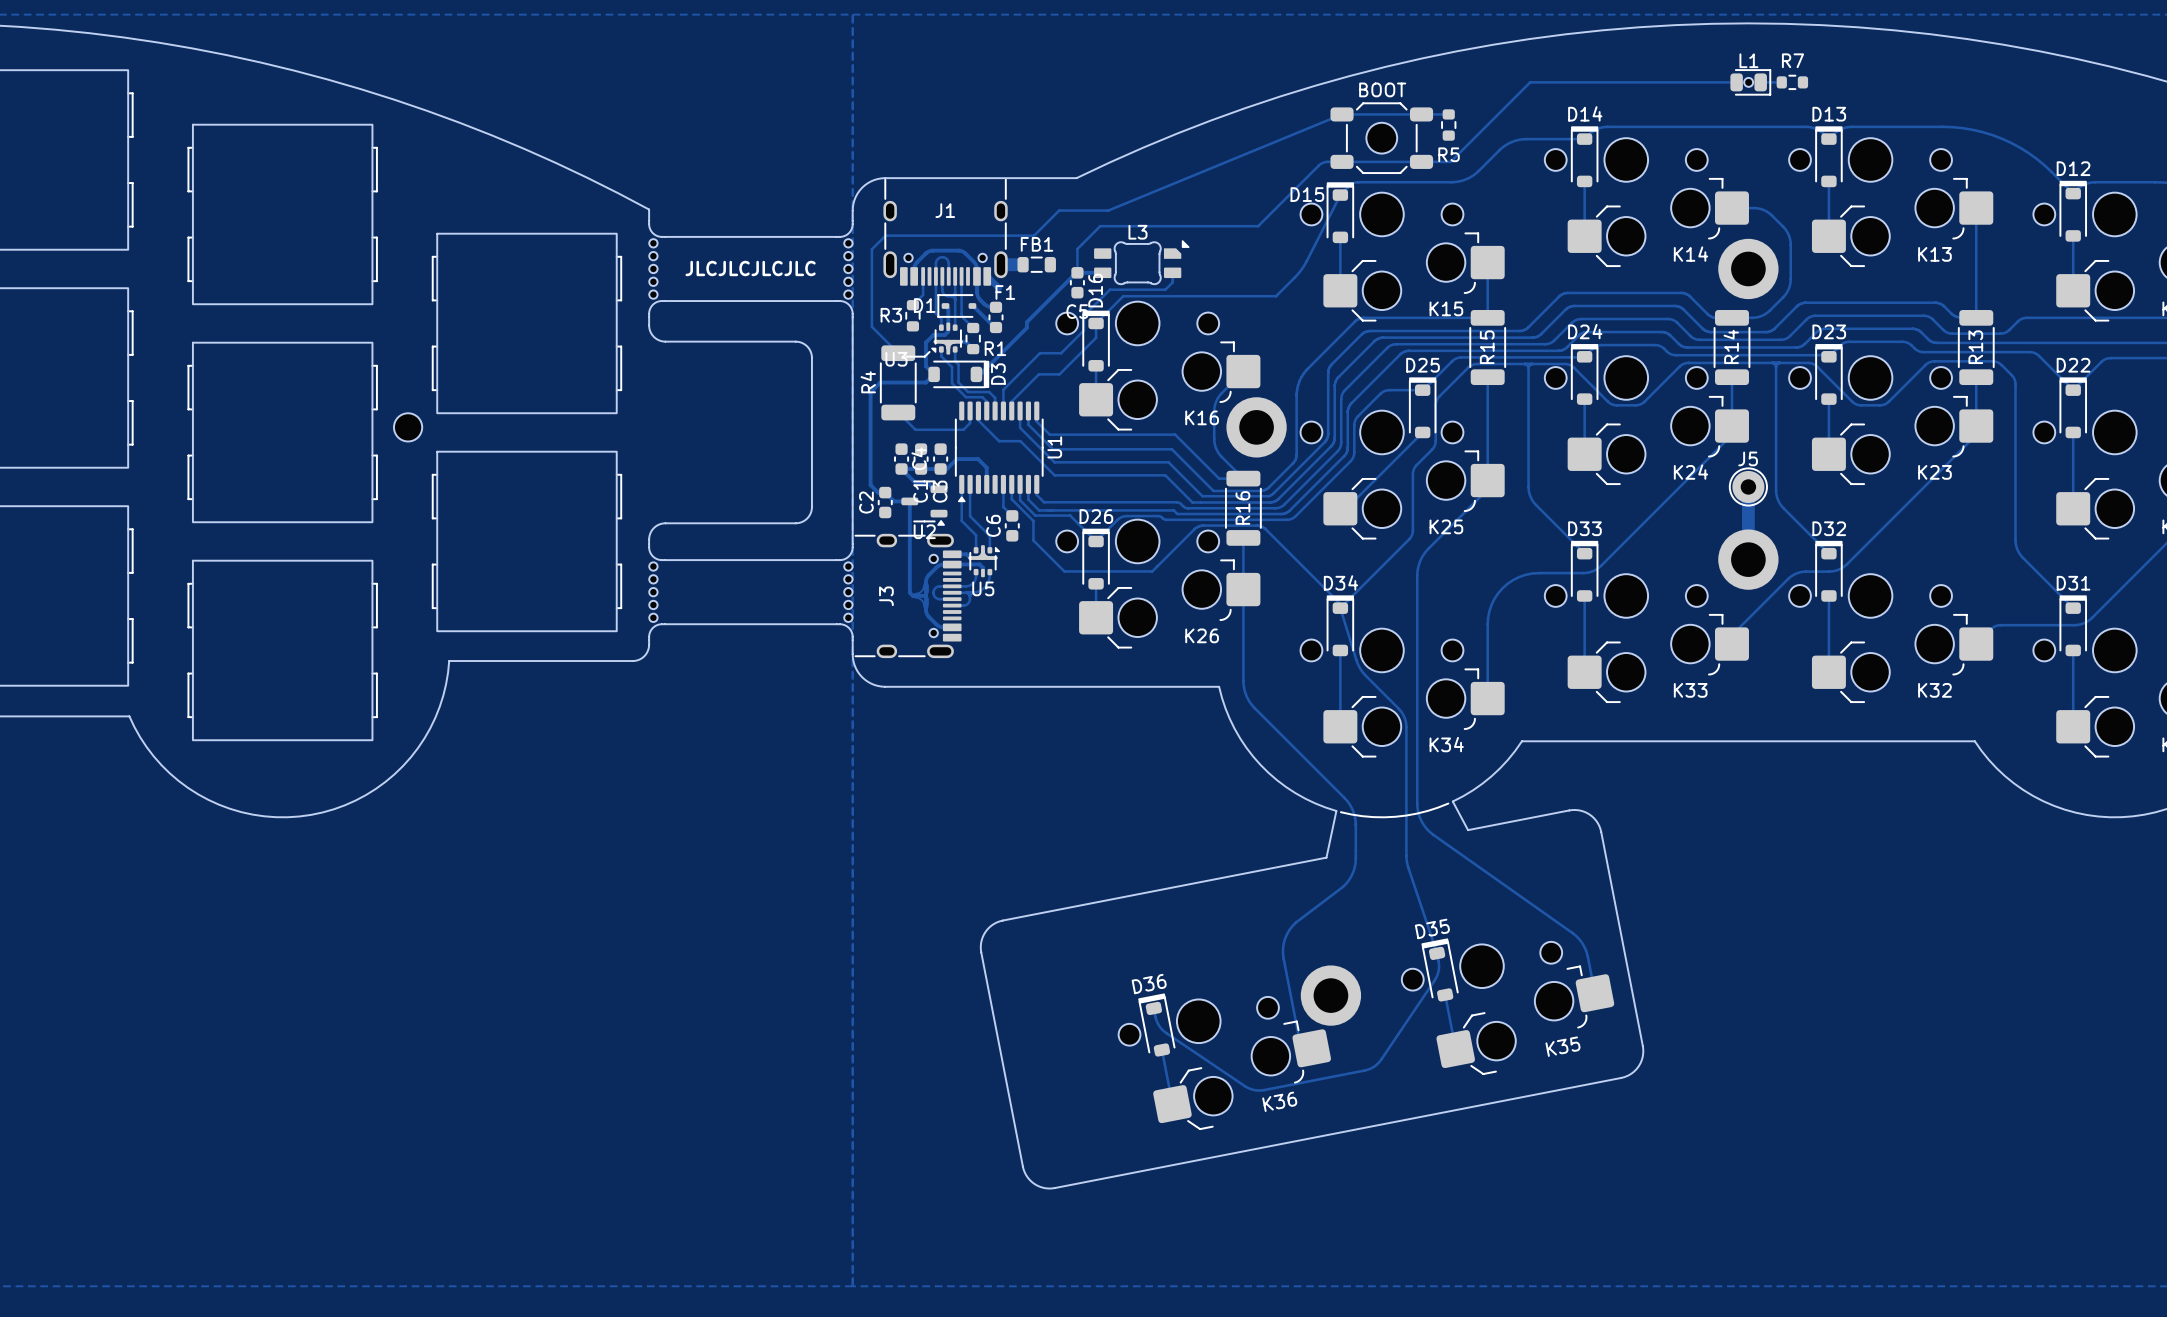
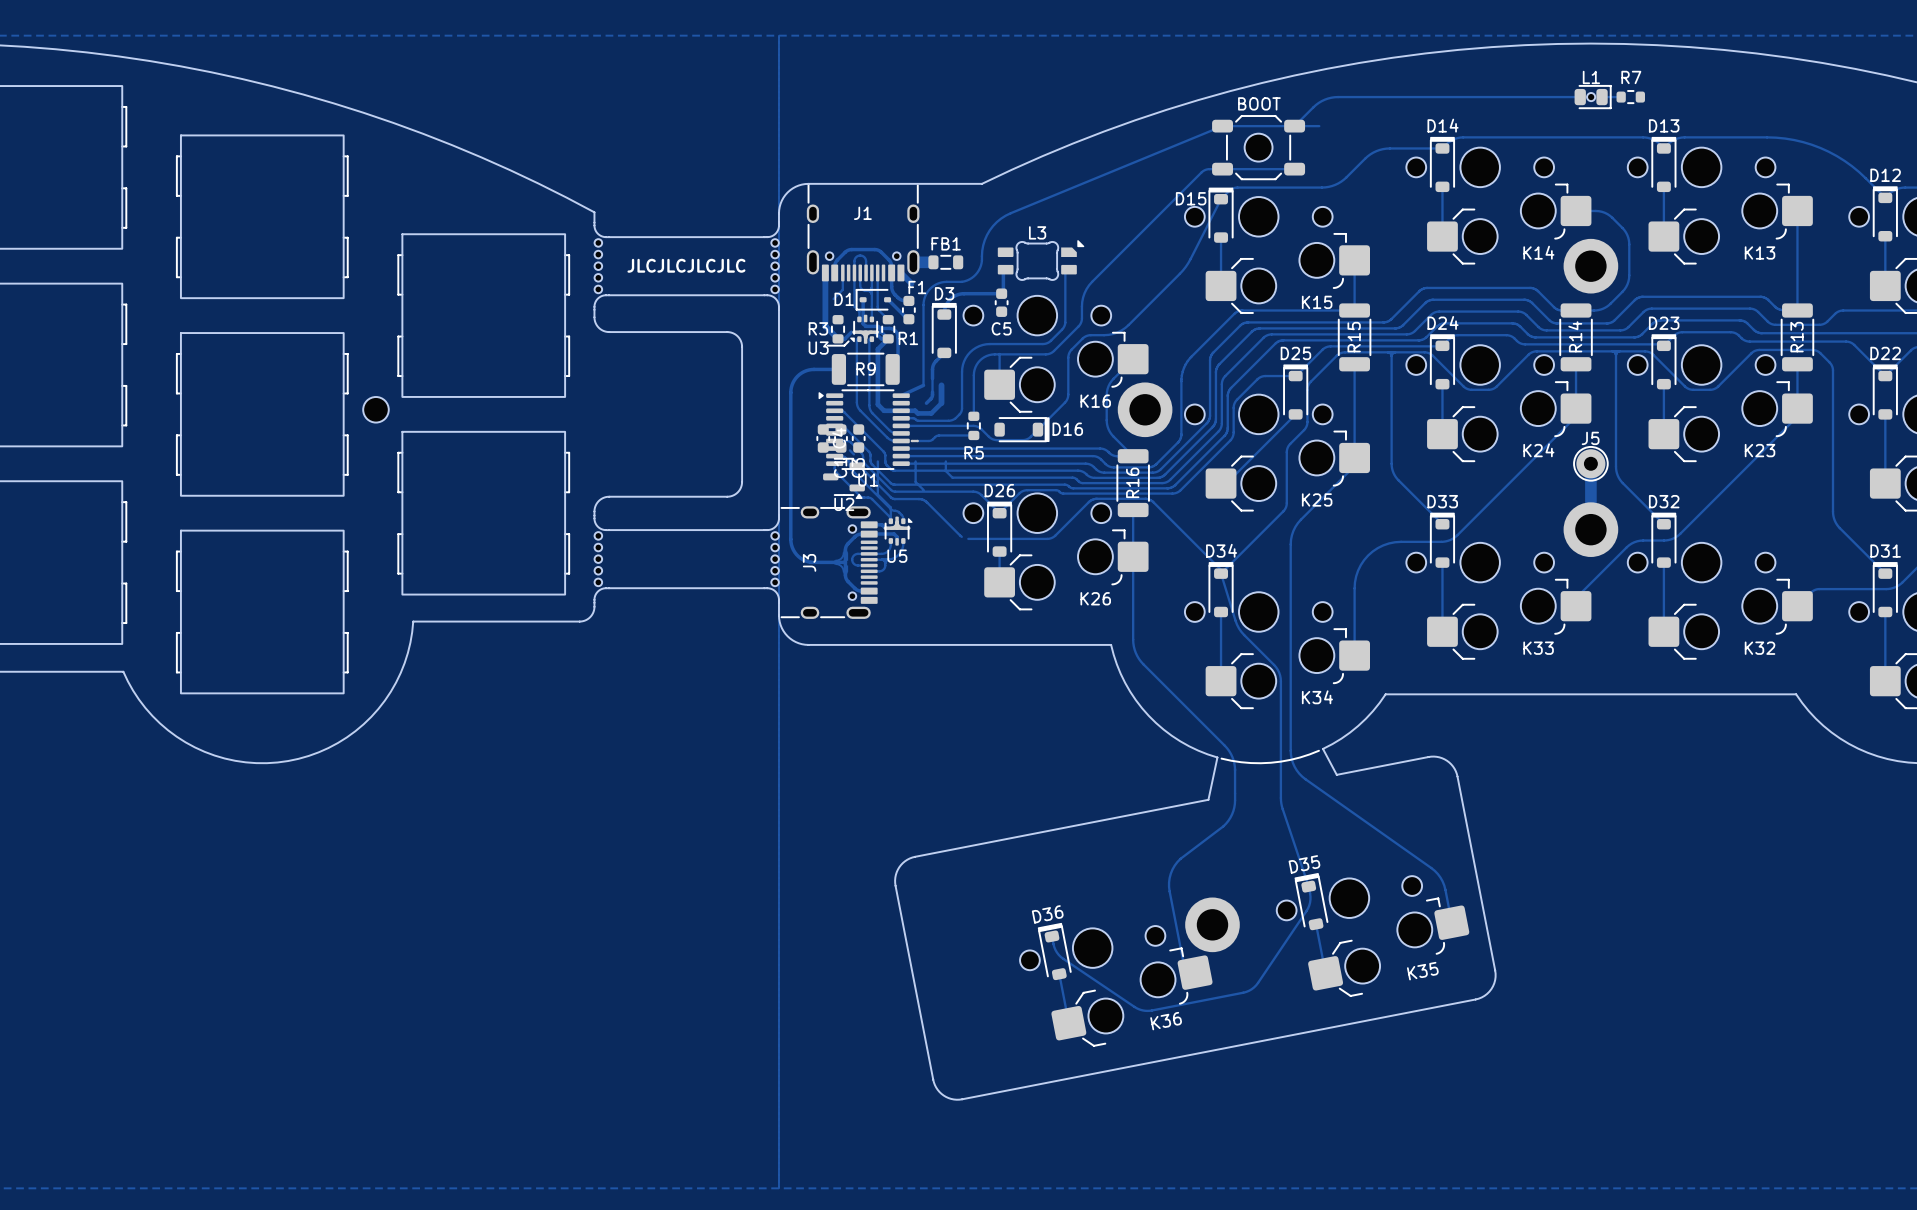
track: (1530, 82) (1450, 161) (1421, 161) -> (1393, 97) (1327, 98) (1315, 104) (1294, 126)
R5 position: (1448, 125) -> (973, 425)
track: (1108, 210) (1059, 210) (1034, 235) (885, 235) (871, 249) (871, 326) (898, 353) -> (1010, 213) (996, 222) (987, 235) (983, 245) (980, 265) (973, 276) (961, 281) (939, 283) (927, 292) (923, 305) (923, 385) (901, 395)
track: (1258, 226) (1100, 226) (1077, 248) (1077, 272) (1102, 272) -> (1146, 227) (1089, 285) (1083, 297) (1080, 323) (1053, 351) (1045, 354) (992, 354) (979, 360) (974, 372) (973, 416)
track: (1077, 271) (1026, 322) (1026, 327) (980, 374) (976, 374) -> none
track: none -> (1003, 269) (1003, 293)
track: (1172, 272) (1172, 282) (1165, 289) (1110, 289) (1083, 315) (1083, 330) (1061, 353) (1039, 353) (1003, 389) (1003, 410) -> (1069, 269) (1065, 273) (1065, 323) (1050, 341) (1042, 344) (986, 344) (975, 347) (967, 354) (962, 364) (961, 409) (955, 418) (948, 420) (917, 420) (913, 418) (901, 418)
track: none -> (825, 272) (825, 326) (838, 338) (844, 338) (851, 332)
C5 position: (1077, 282) -> (1001, 302)
track: (1276, 296) (1123, 296) (1096, 323) (1096, 337) (1059, 374) (1038, 374) (1011, 401) (1011, 410) -> (1162, 290) (1121, 330) (1108, 334) (1086, 336) (1071, 349) (1068, 356) (1066, 399) (1028, 438) (994, 439) (974, 425) (901, 425)
track: none -> (1000, 293) (957, 294) (948, 301) (944, 313)
track: (945, 305) (948, 308) (948, 331) (944, 335) (933, 335) (925, 342) (925, 366) (934, 374) (925, 382) (880, 382) (870, 392) (870, 485) (878, 492) (885, 492) (894, 501) (909, 501) (909, 592) (912, 595) (925, 595) -> (838, 369) (806, 370) (795, 378) (791, 387) (790, 539) (794, 552) (805, 560) (845, 562)
track: none -> (863, 299) (863, 323) (865, 326) (891, 328) (896, 332) (898, 369)
R3 position: (912, 315) -> (838, 329)
track: none -> (874, 332) (881, 338) (888, 338) (877, 349) (877, 404) (884, 410) (915, 410) (917, 413) (931, 413) (941, 403) (941, 385)
D16 rotation: 0° (1096, 341) -> 90° clockwise (1021, 429)
D16 position: (1096, 341) -> (1021, 429)
track: none -> (856, 339) (857, 406) (888, 438) (895, 440)
track: (941, 349) (941, 356) (952, 367) (952, 383) (965, 397) (982, 397) (986, 401) (986, 410) -> none
track: none -> (869, 339) (869, 408) (890, 430) (897, 433)
track: (955, 349) (955, 361) (958, 364) (958, 382) (968, 392) (989, 392) (995, 397) (995, 410) -> none
track: none -> (944, 352) (933, 366) (932, 395) (926, 403)
D3 rotation: 0° (958, 374) -> 90° counterclockwise (944, 330)
D3 position: (958, 374) -> (944, 330)
R4: (898, 382) -> none
R9: none -> (865, 369)
track: (970, 410) (970, 423) (963, 429) (915, 429) (898, 412) -> none
track: (978, 410) (978, 420) (999, 441) (1020, 441) (1054, 475) (1165, 475) (1192, 502) (1201, 502) -> (841, 410) (884, 452) (885, 463) (893, 470) (1077, 470) (1094, 477)
track: (1020, 410) (1020, 427) (1054, 462) (1168, 462) (1202, 496) (1268, 496) (1274, 492) -> (901, 463) (1085, 463) (1104, 472) (1153, 472) (1160, 469)
track: (1028, 410) (1028, 424) (1053, 449) (1171, 449) (1213, 490) (1222, 490) -> (901, 456) (1094, 456) (1108, 466) (1113, 467)
track: (1036, 410) (1036, 421) (1049, 434) (1175, 434) (1219, 478) (1226, 478) -> (901, 448) (1100, 448) (1117, 456)
U1 rotation: 0° (999, 451) -> 90° clockwise (864, 429)
track: none -> (970, 435) (938, 435) (930, 440) (917, 440)
part: none -> (914, 440)
track: none -> (849, 450) (853, 454)
track: none -> (841, 456) (848, 460) (851, 469) (890, 509) (895, 510)
track: none -> (855, 459) (891, 497) (924, 500) (961, 536)
track: (970, 484) (970, 516) (989, 536) (989, 547) -> (895, 510) (899, 512) (903, 519)
track: (986, 484) (986, 467) (978, 459) (956, 459) (946, 469) (901, 469) (916, 483) (928, 483) (933, 489) (939, 489) -> none
track: (1011, 484) (1011, 499) (1033, 520) (1033, 540) (1064, 571) (1152, 571) (1157, 566) -> (968, 538) (1047, 538) (1055, 535)
track: (1020, 484) (1020, 500) (1035, 515) (1070, 515) (1076, 521) -> (834, 440) (850, 442) (862, 453) (864, 463) (892, 491) (973, 491) (981, 495)
track: (1028, 484) (1028, 499) (1039, 510) (1173, 510) (1177, 514) -> (841, 425) (869, 452) (871, 463) (892, 484) (1064, 484) (1073, 488)
track: none -> (834, 463) (836, 472) (860, 496) (872, 499) (890, 520)
C2: (885, 502) -> none
C6: (1012, 525) -> none

